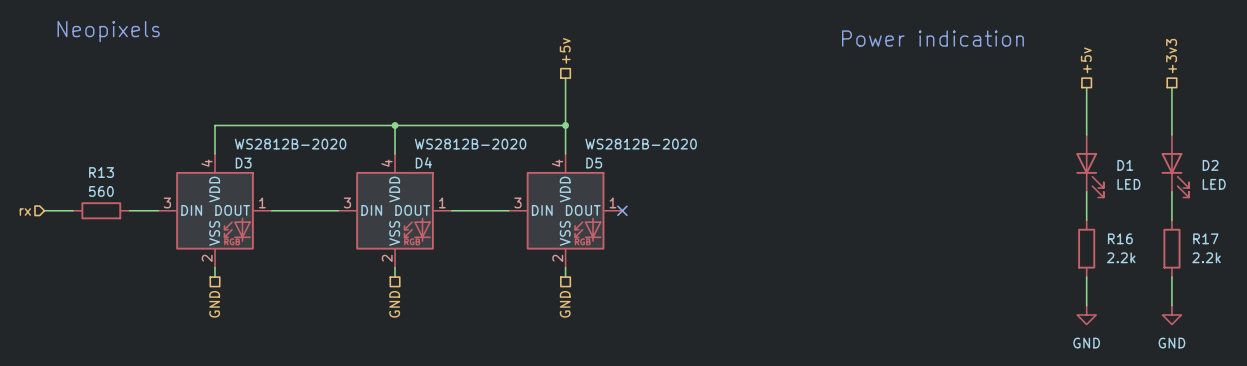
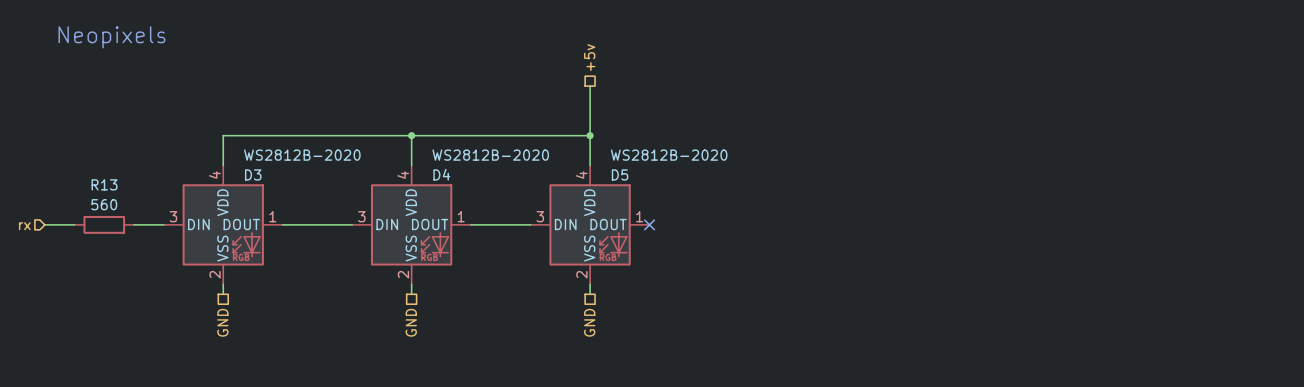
text: Power indication (932, 38) -> none
hierarchical label: +3v3 (1171, 56) -> none
hierarchical label: +5v (1086, 60) -> none
wire: (1086, 87) (1086, 134) -> none
wire: (1171, 87) (1171, 134) -> none
D1: LED (1090, 166) -> none
D2: LED (1175, 166) -> none
wire: (1086, 191) (1086, 220) -> none
wire: (1171, 191) (1171, 220) -> none
R16: 2.2k (1086, 248) -> none
R17: 2.2k (1171, 248) -> none
wire: (1086, 277) (1086, 305) -> none
wire: (1171, 277) (1171, 305) -> none
power symbol: GND (1086, 314) -> none
power symbol: GND (1171, 314) -> none

